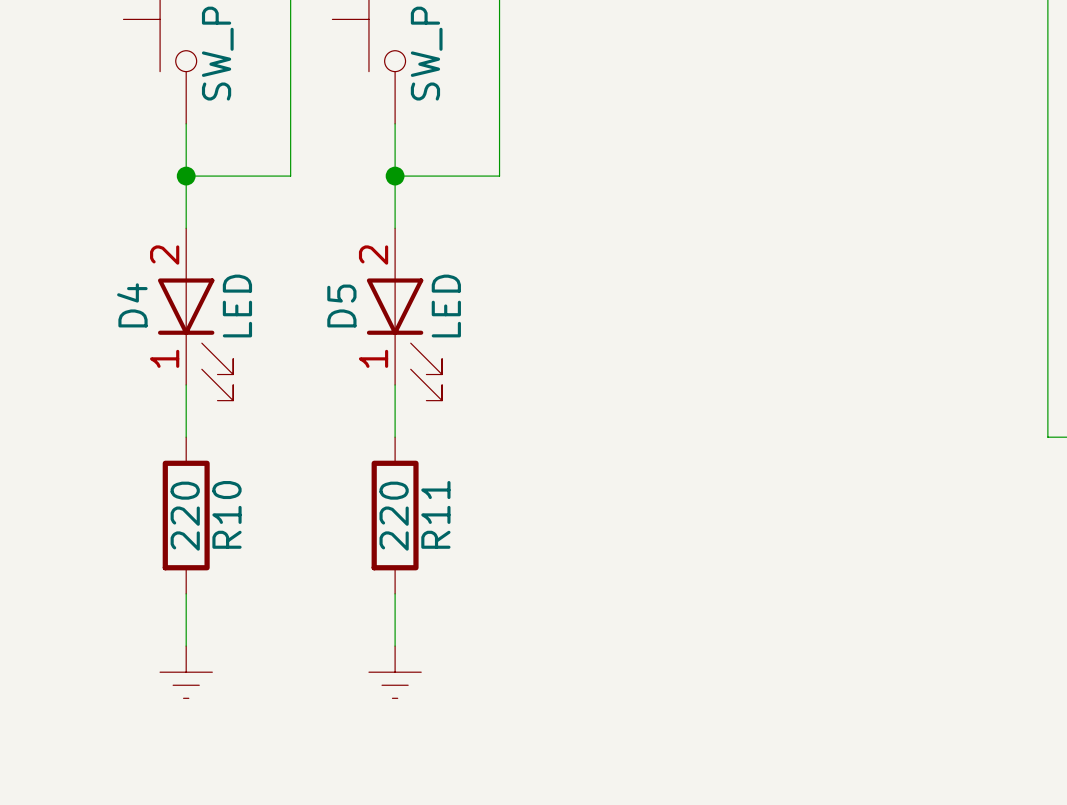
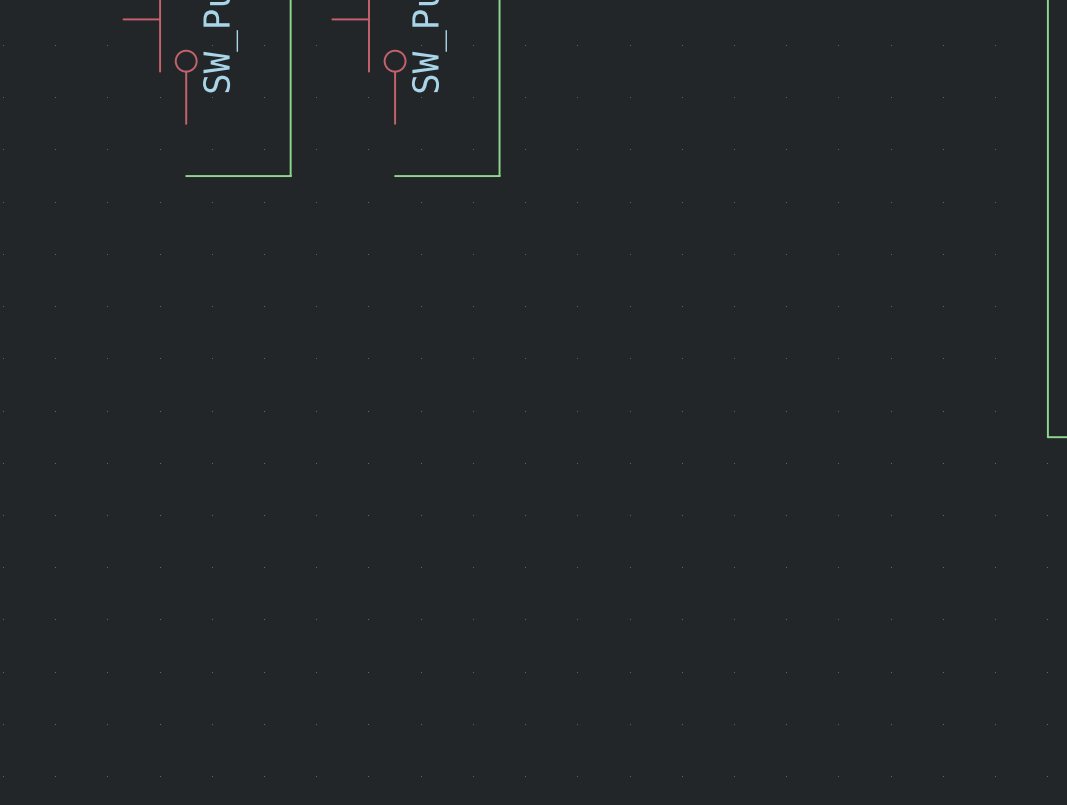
wire: (186, 123) (186, 228) -> none
wire: (395, 123) (395, 228) -> none
junction: (186, 176) -> none
junction: (395, 176) -> none
D4: LED (195, 314) -> none
D5: LED (404, 314) -> none
wire: (186, 384) (186, 437) -> none
wire: (395, 384) (395, 437) -> none
R10: 220 (186, 515) -> none
R11: 220 (395, 515) -> none
wire: (186, 593) (186, 646) -> none
wire: (395, 593) (395, 646) -> none
power symbol: (186, 672) -> none
power symbol: (395, 672) -> none

